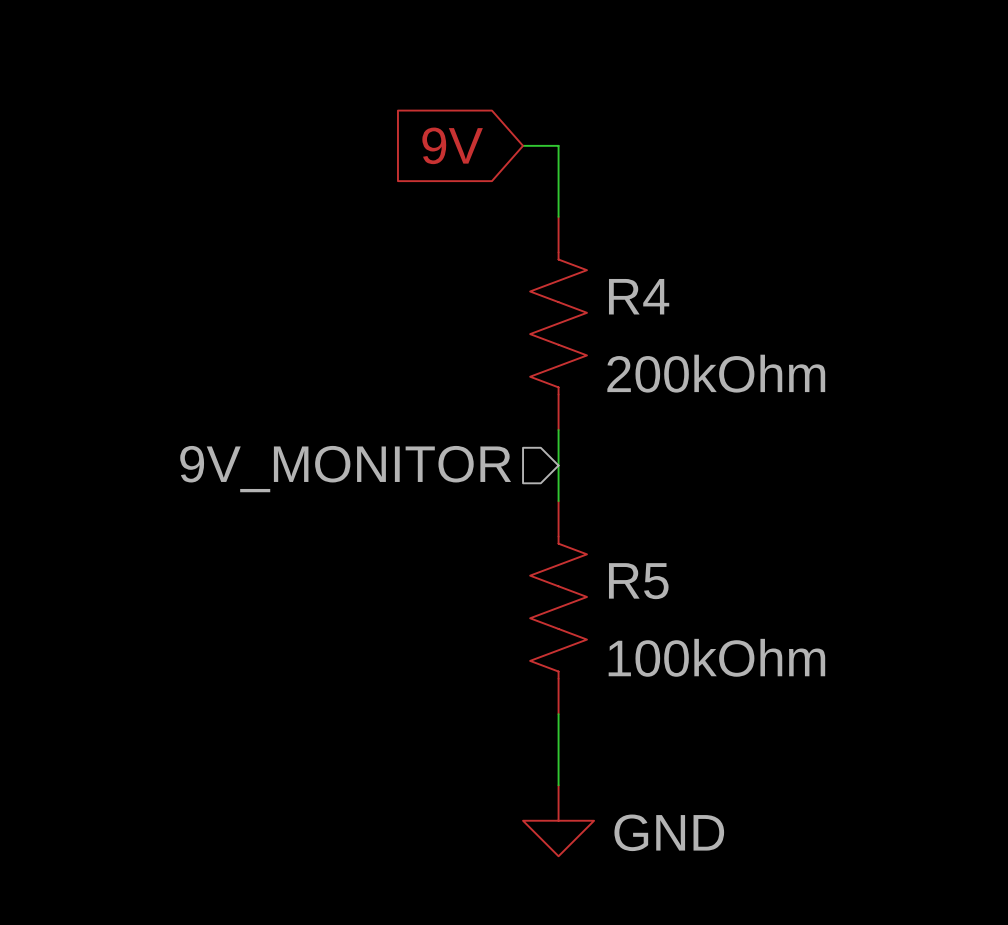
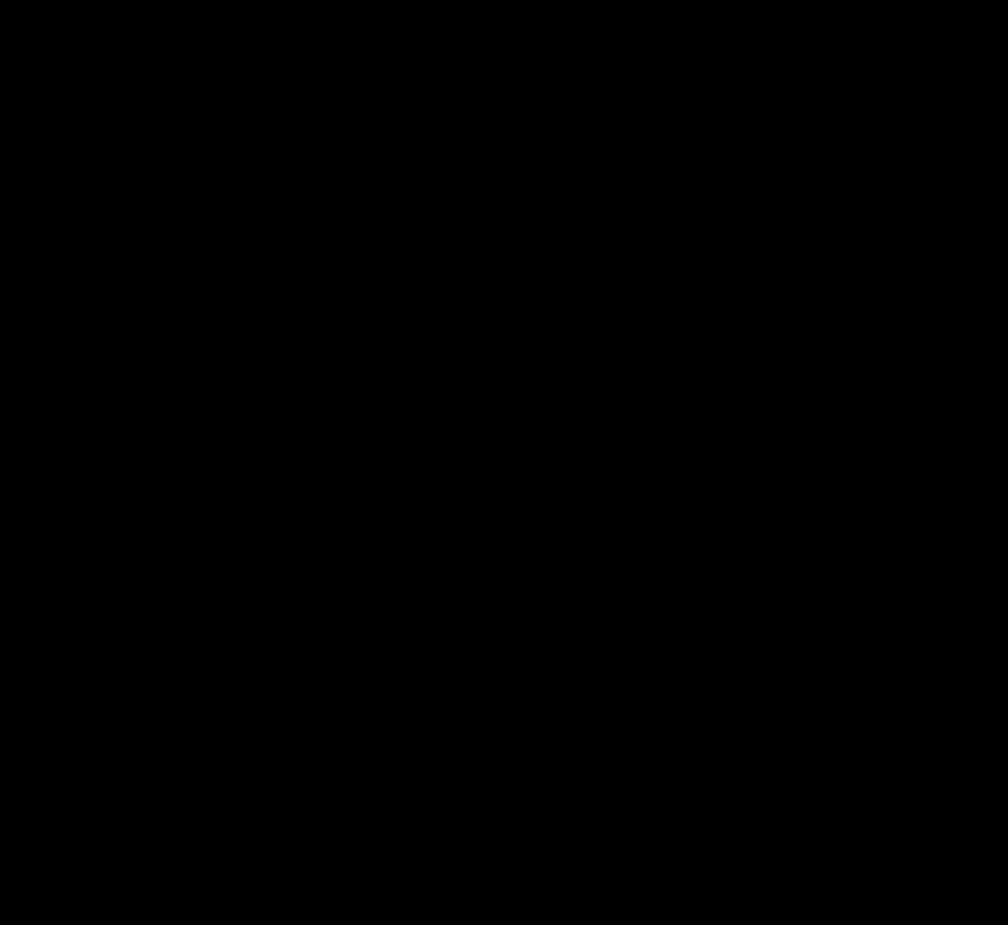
global label: 9V (452, 145) -> none
wire: (523, 145) (558, 145) (558, 216) -> none
R4: 200kOhm (558, 323) -> none
wire: (558, 430) (558, 501) -> none
hierarchical label: 9V_MONITOR (345, 469) -> none
R5: 100kOhm (558, 607) -> none
wire: (558, 714) (558, 785) -> none
power symbol: GND (558, 820) -> none

